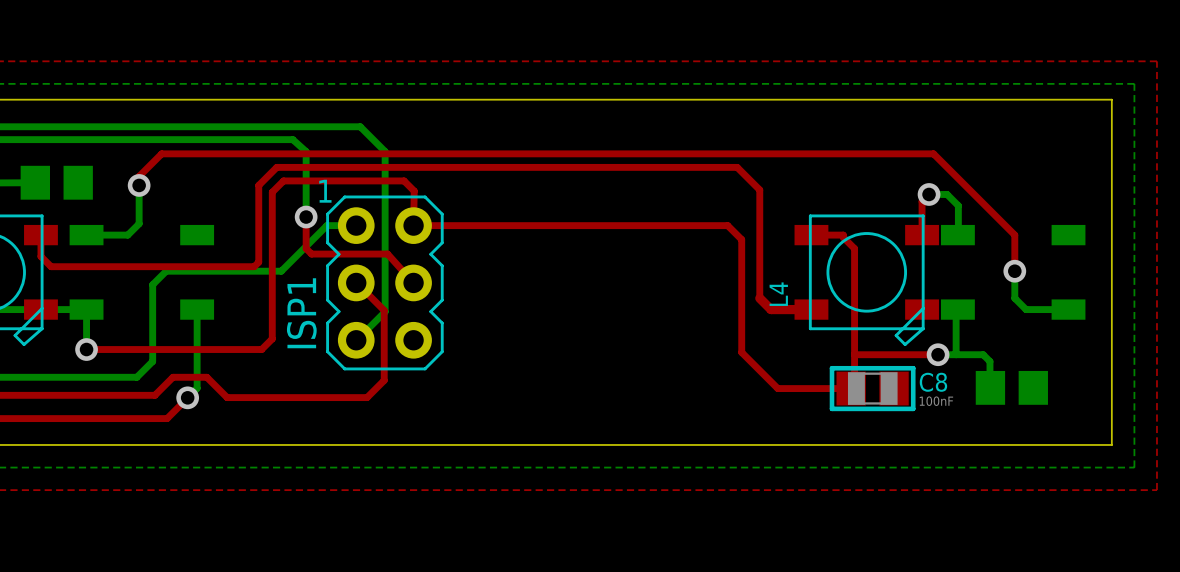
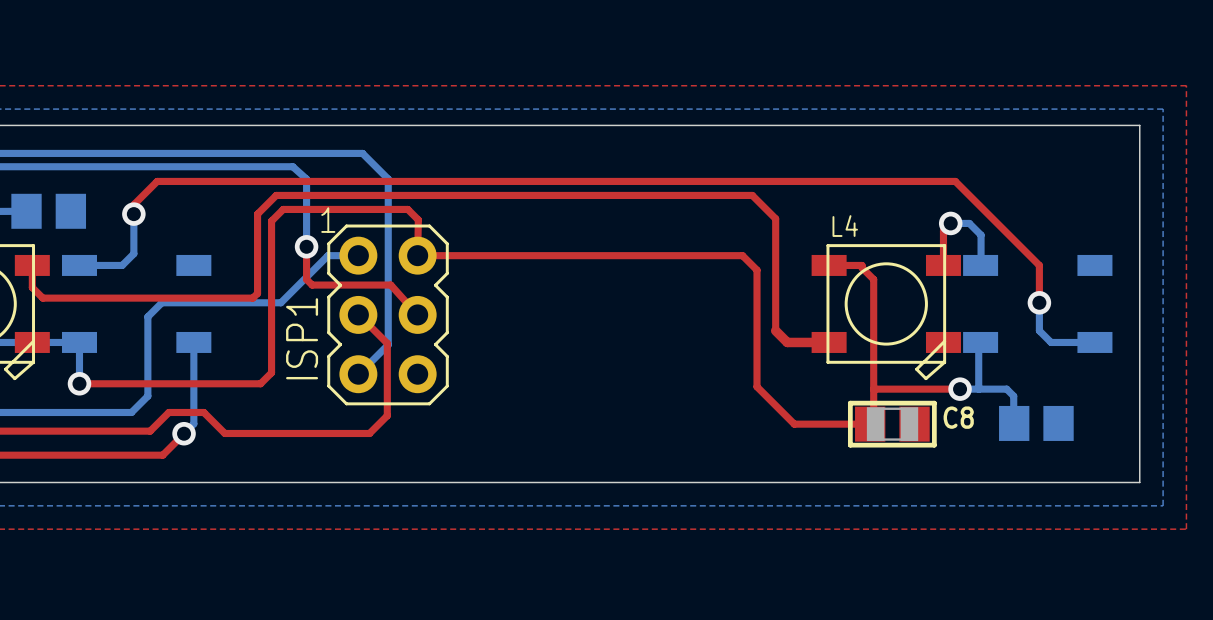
L4 name rotation: 0° (778, 294) -> 90° clockwise (845, 226)
L4 name position: L4 (778, 294) -> L4 (845, 226)
C8 value: 100nF (936, 401) -> none

